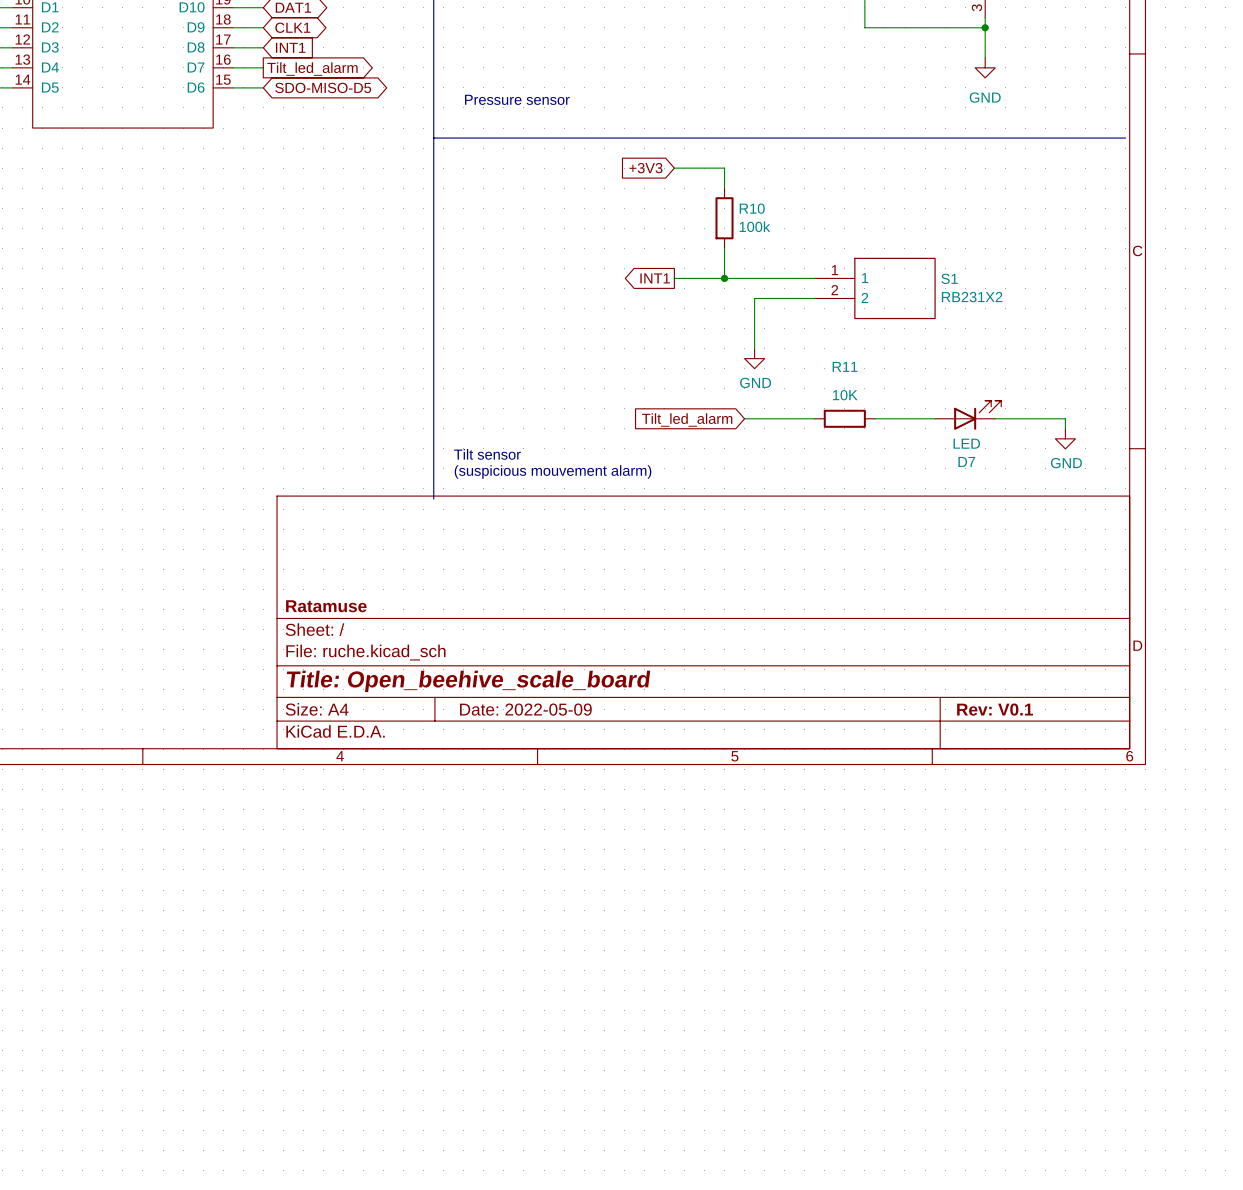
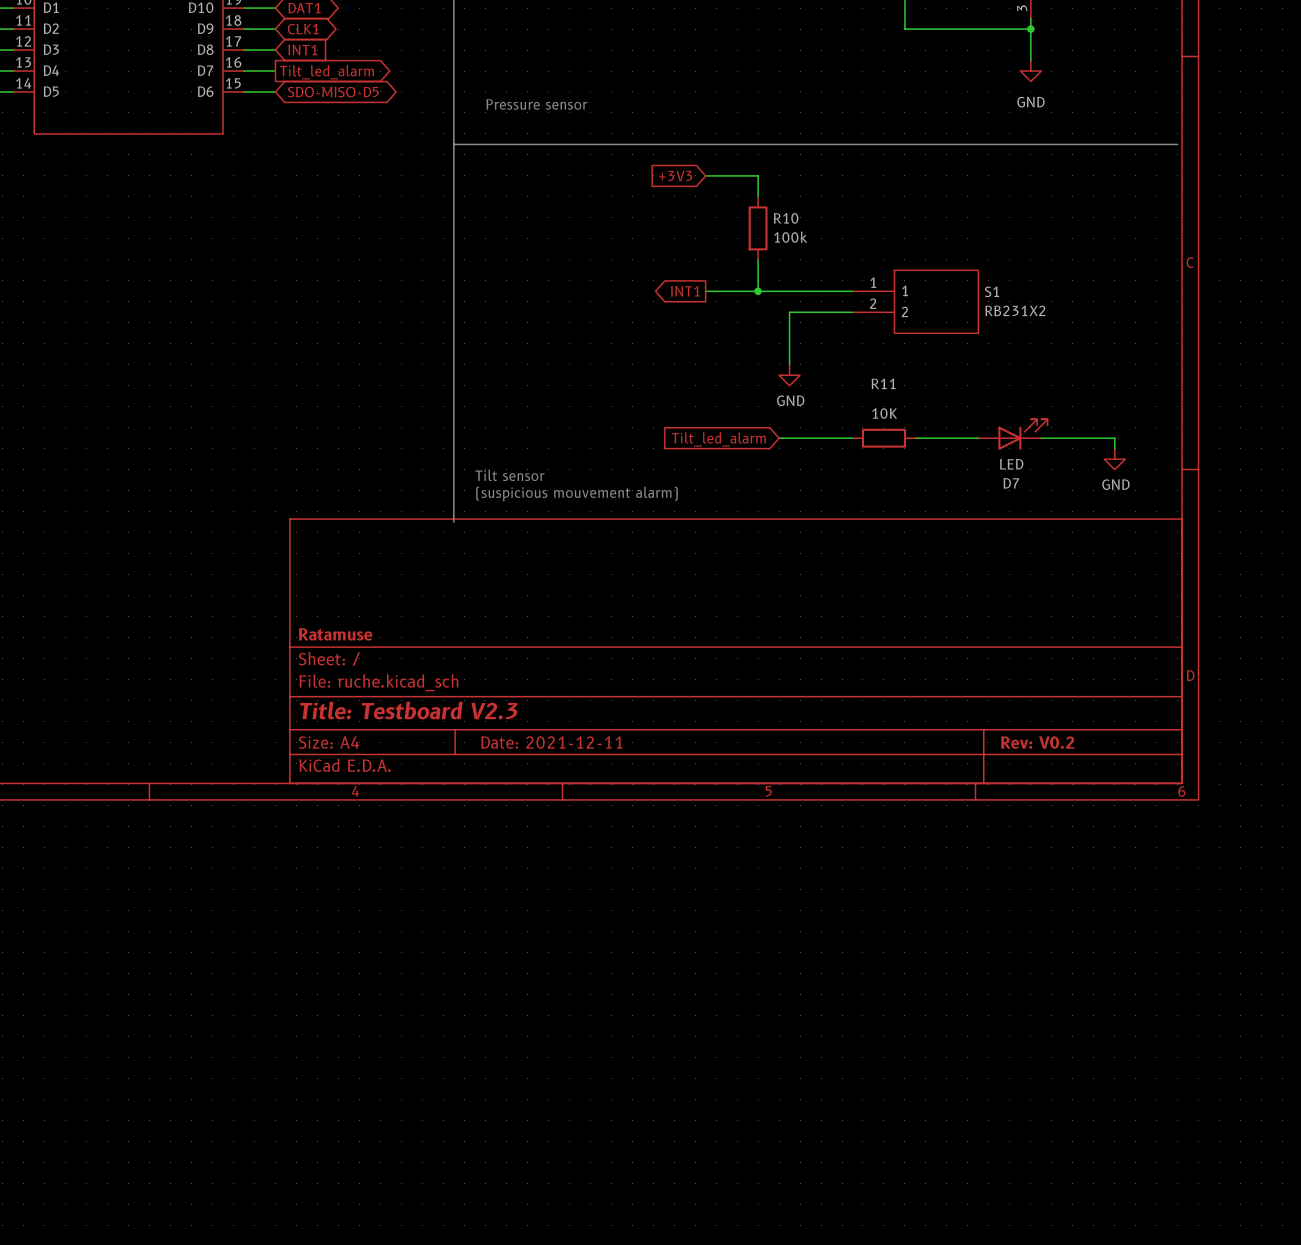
title block: Title: Open_beehive_scale_board (468, 681) -> Title: Testboard V2.3 (408, 710)
title block: Date: 2022-05-09 (525, 709) -> Date: 2021-12-11 (551, 742)
title block: Rev: V0.1 (995, 709) -> Rev: V0.2 (1037, 742)

